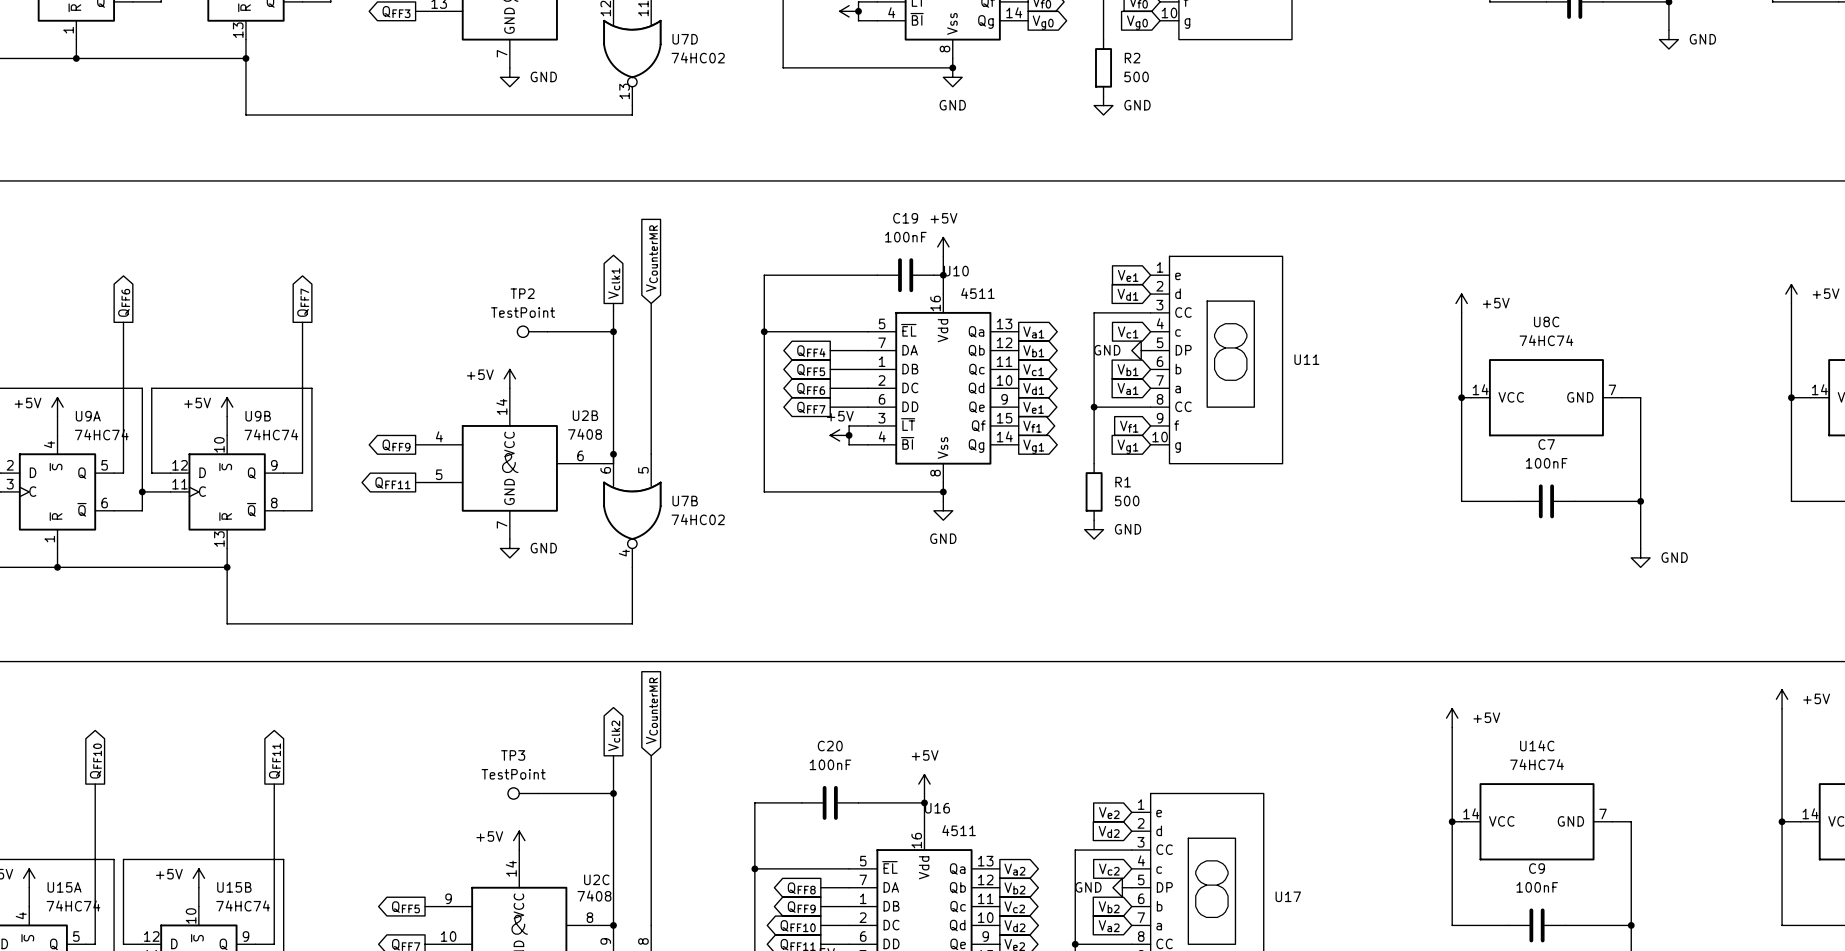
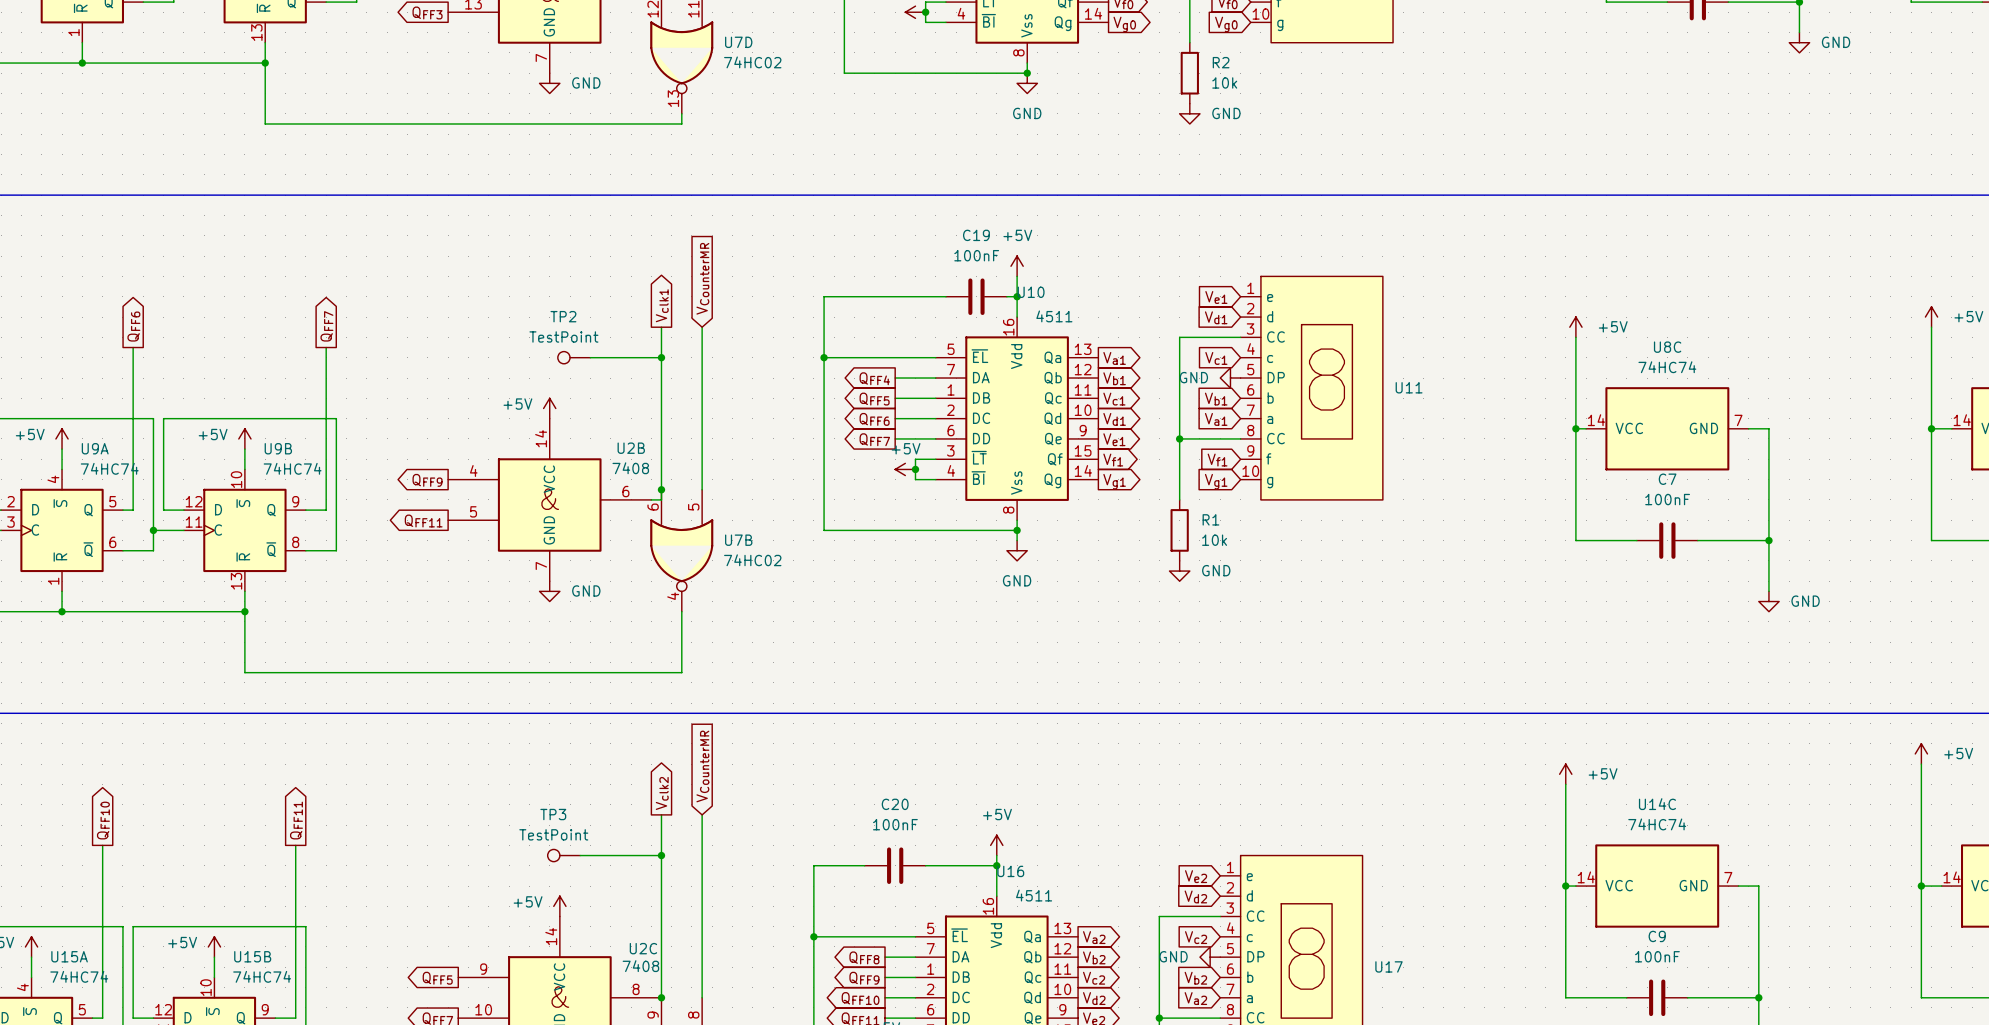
R2 value: 500 (1136, 76) -> 10k (1224, 82)
R1 value: 500 (1127, 501) -> 10k (1214, 540)

